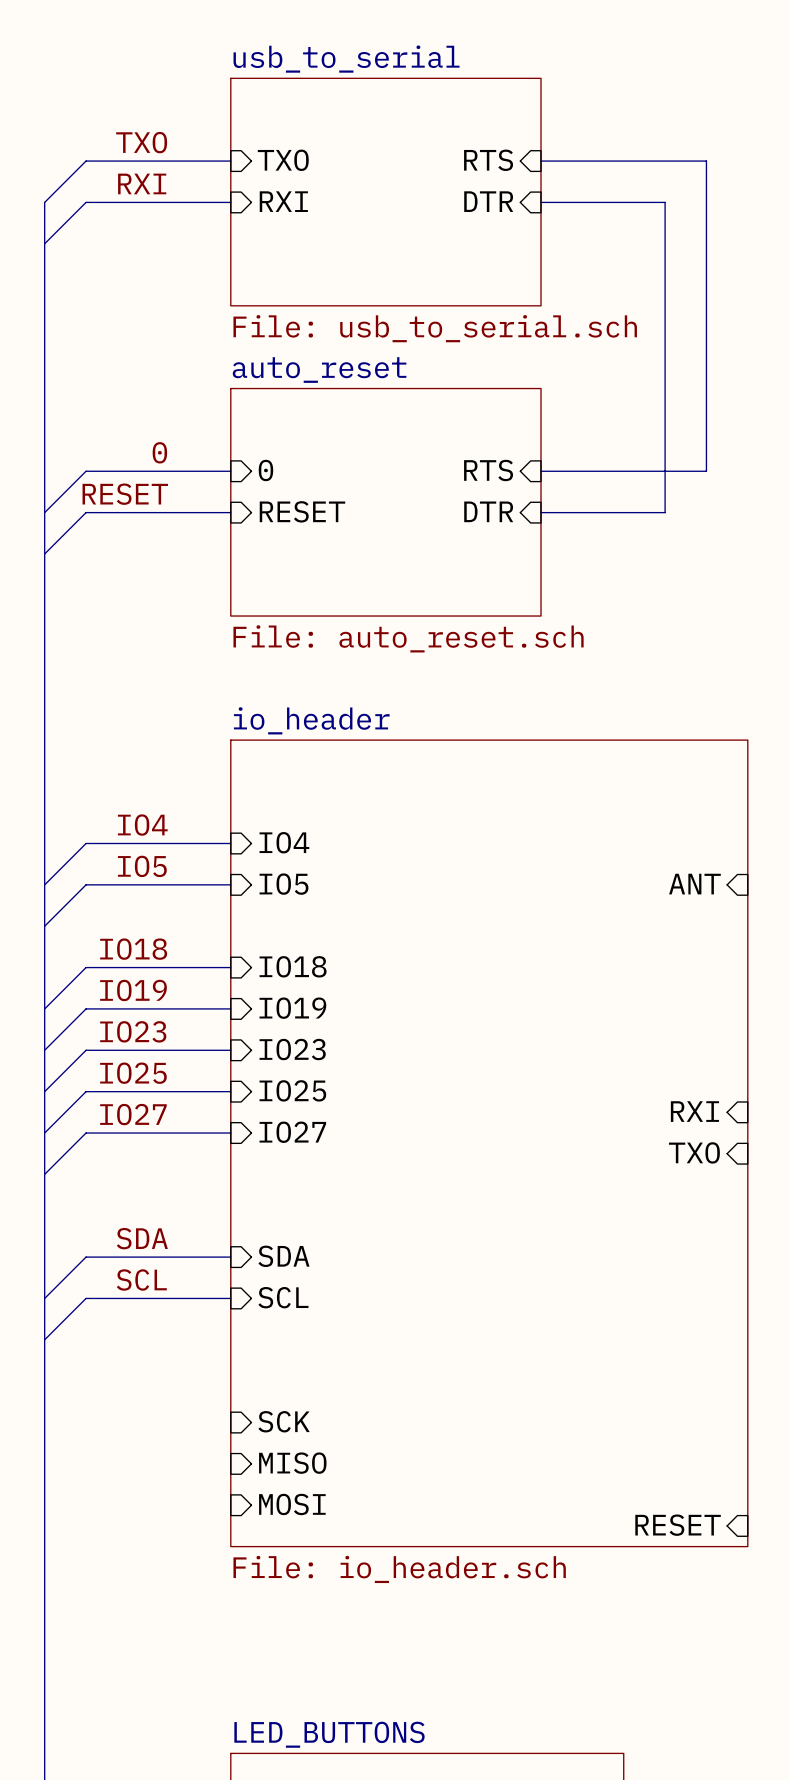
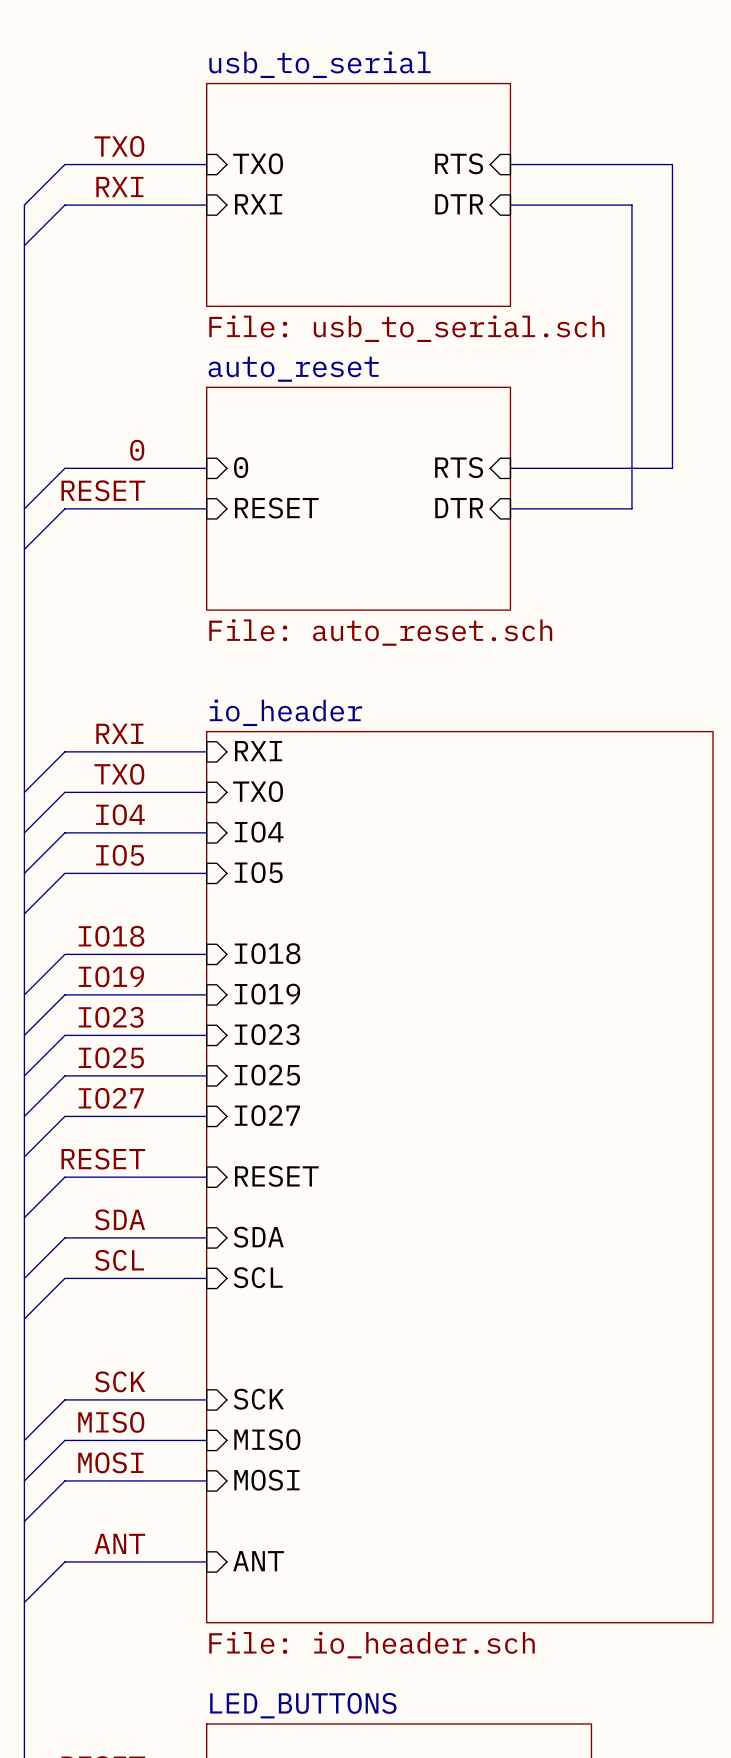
label: none -> RXI (119, 733)
wire: none -> (206, 751) (64, 751) (24, 792)
sheet pin: none -> RXI (258, 751)
label: none -> TXO (119, 774)
sheet pin: none -> TXO (258, 791)
wire: none -> (206, 792) (64, 792) (24, 832)
sheet pin: ANT (694, 884) -> none
sheet pin: RXI (694, 1111) -> none
sheet io_header: File: io_header.sch (489, 1143) -> none
sheet pin: TXO (694, 1152) -> none
label: none -> RESET (103, 1159)
sheet pin: none -> RESET (276, 1176)
wire: none -> (206, 1177) (64, 1177) (24, 1217)
sheet io_header: none -> File: io_header.sch (459, 1177)
label: none -> SCK (120, 1381)
wire: none -> (206, 1399) (64, 1399) (24, 1440)
label: none -> MISO (111, 1422)
wire: none -> (206, 1440) (64, 1440) (24, 1480)
label: none -> MOSI (110, 1462)
wire: none -> (206, 1480) (64, 1480) (24, 1521)
sheet pin: RESET (678, 1525) -> none
label: none -> ANT (119, 1543)
wire: none -> (206, 1561) (64, 1561) (24, 1602)
sheet pin: none -> ANT (258, 1561)

